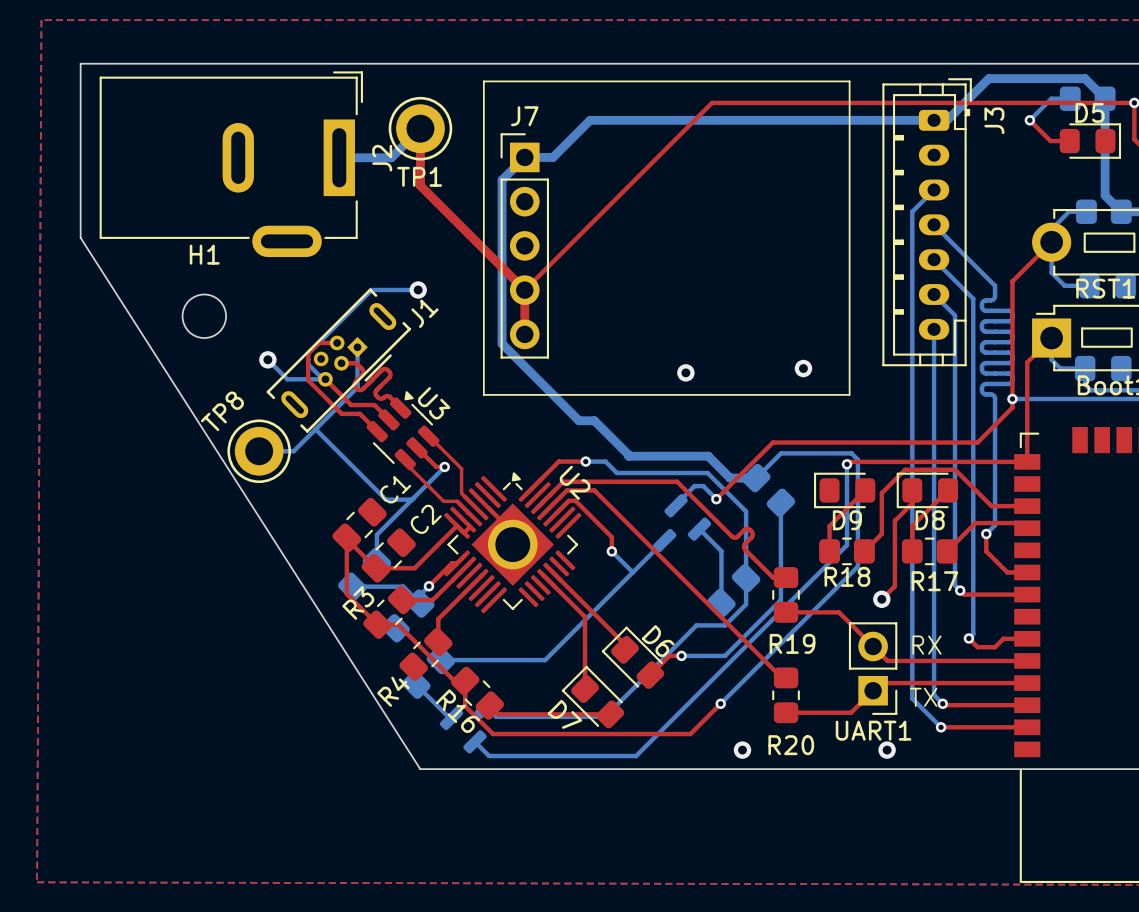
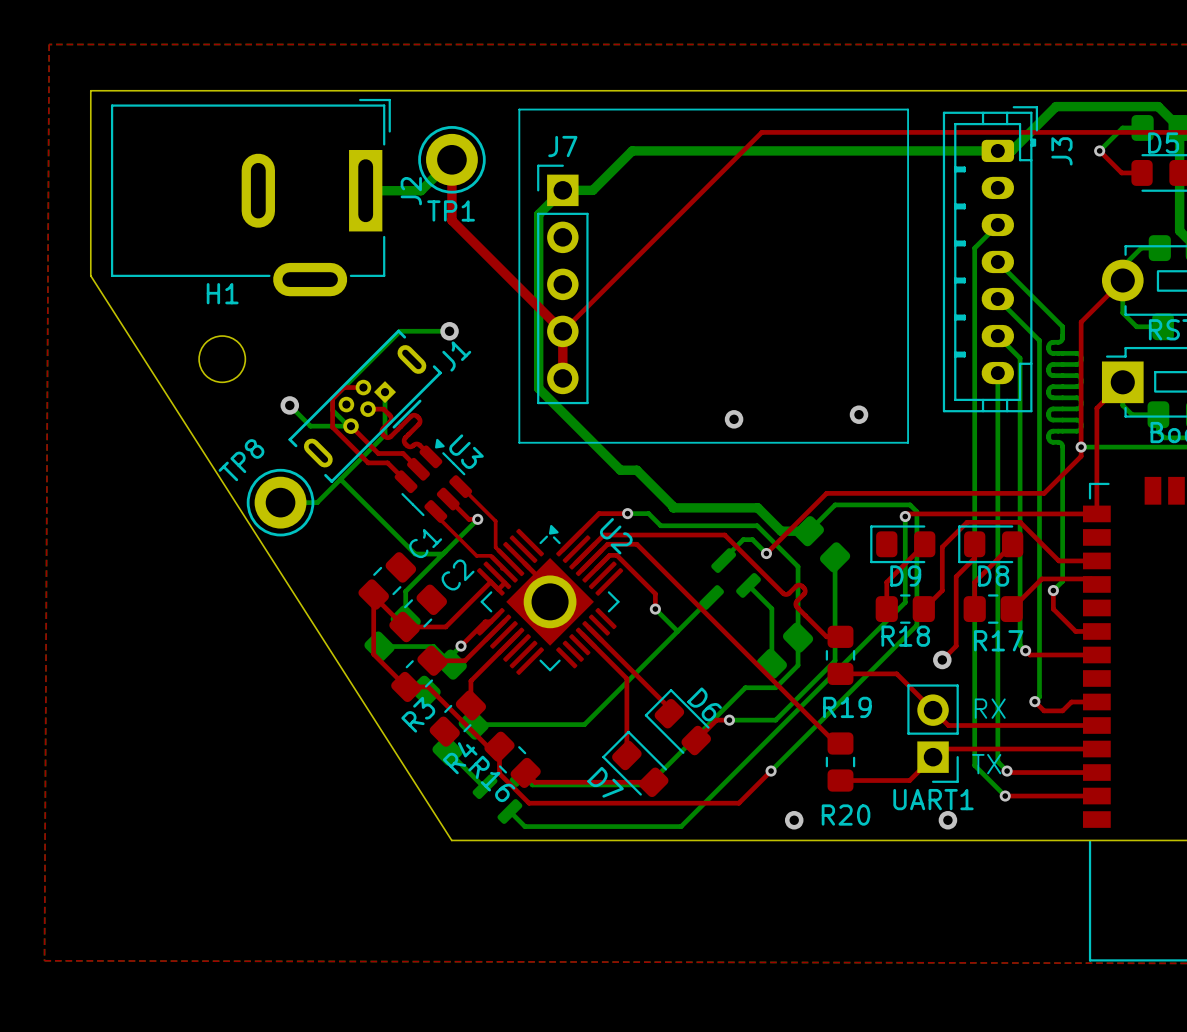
R3 name position: R3 (358, 602) -> R3 (418, 714)
R4 name position: R4 (393, 691) -> R4 (460, 758)

